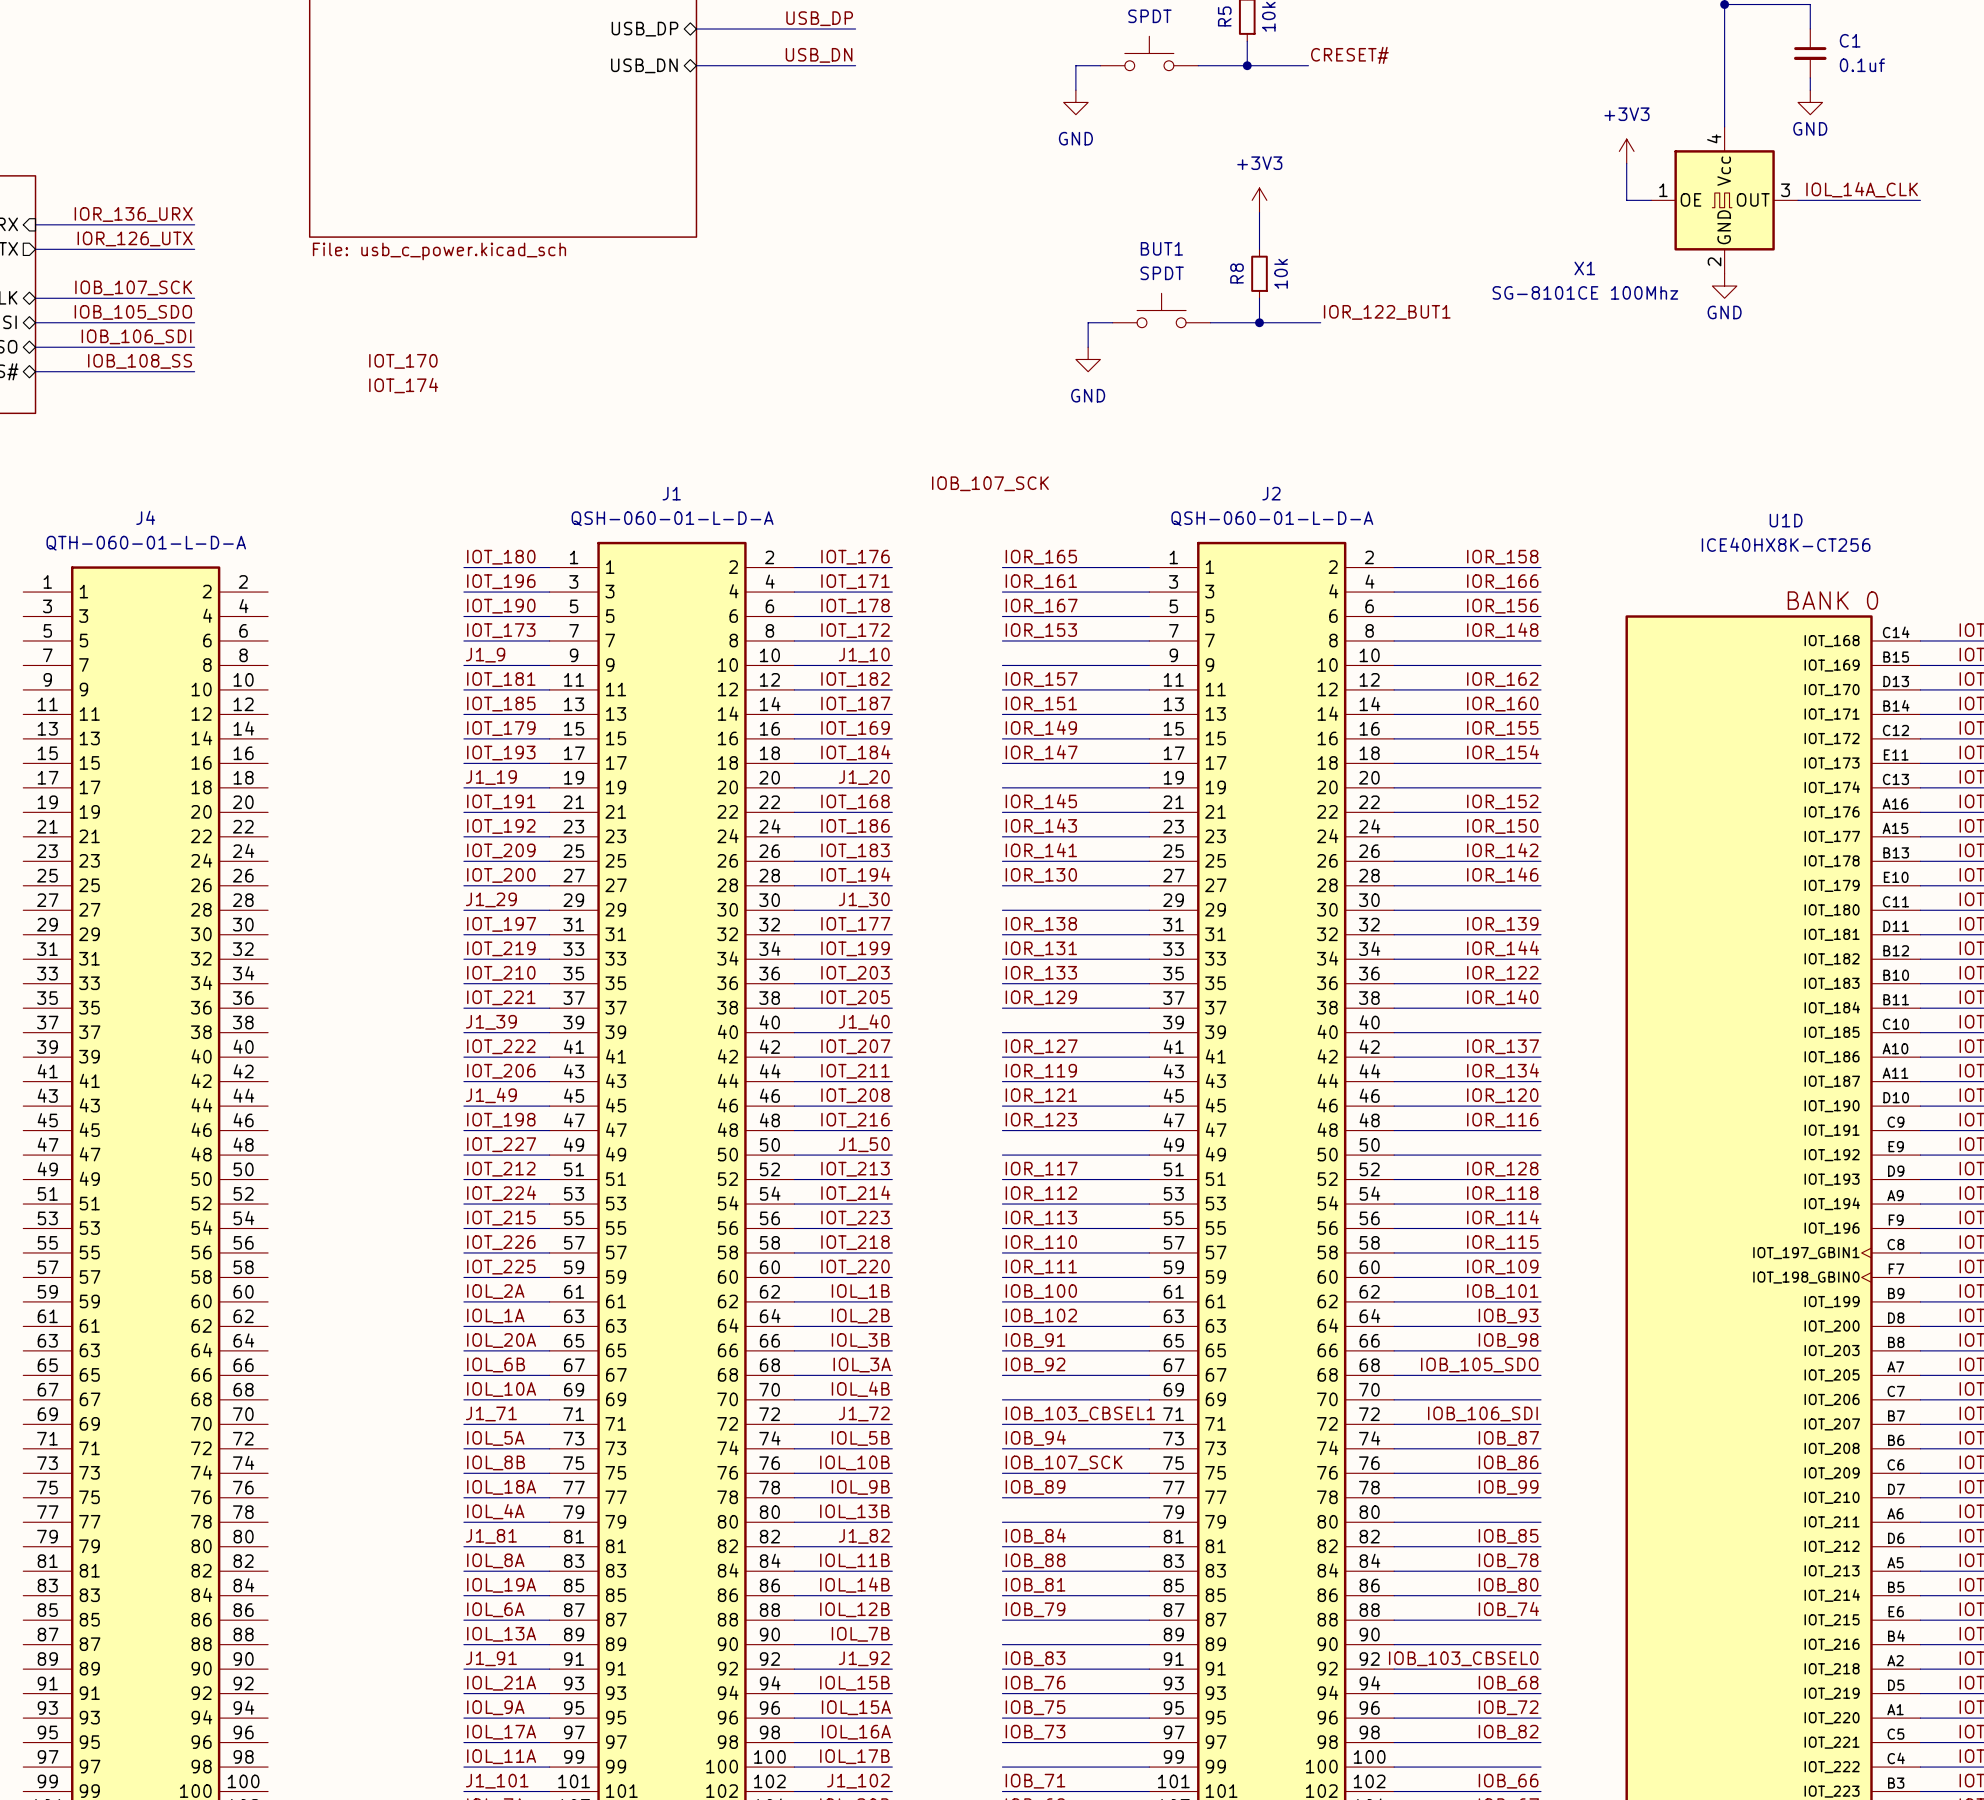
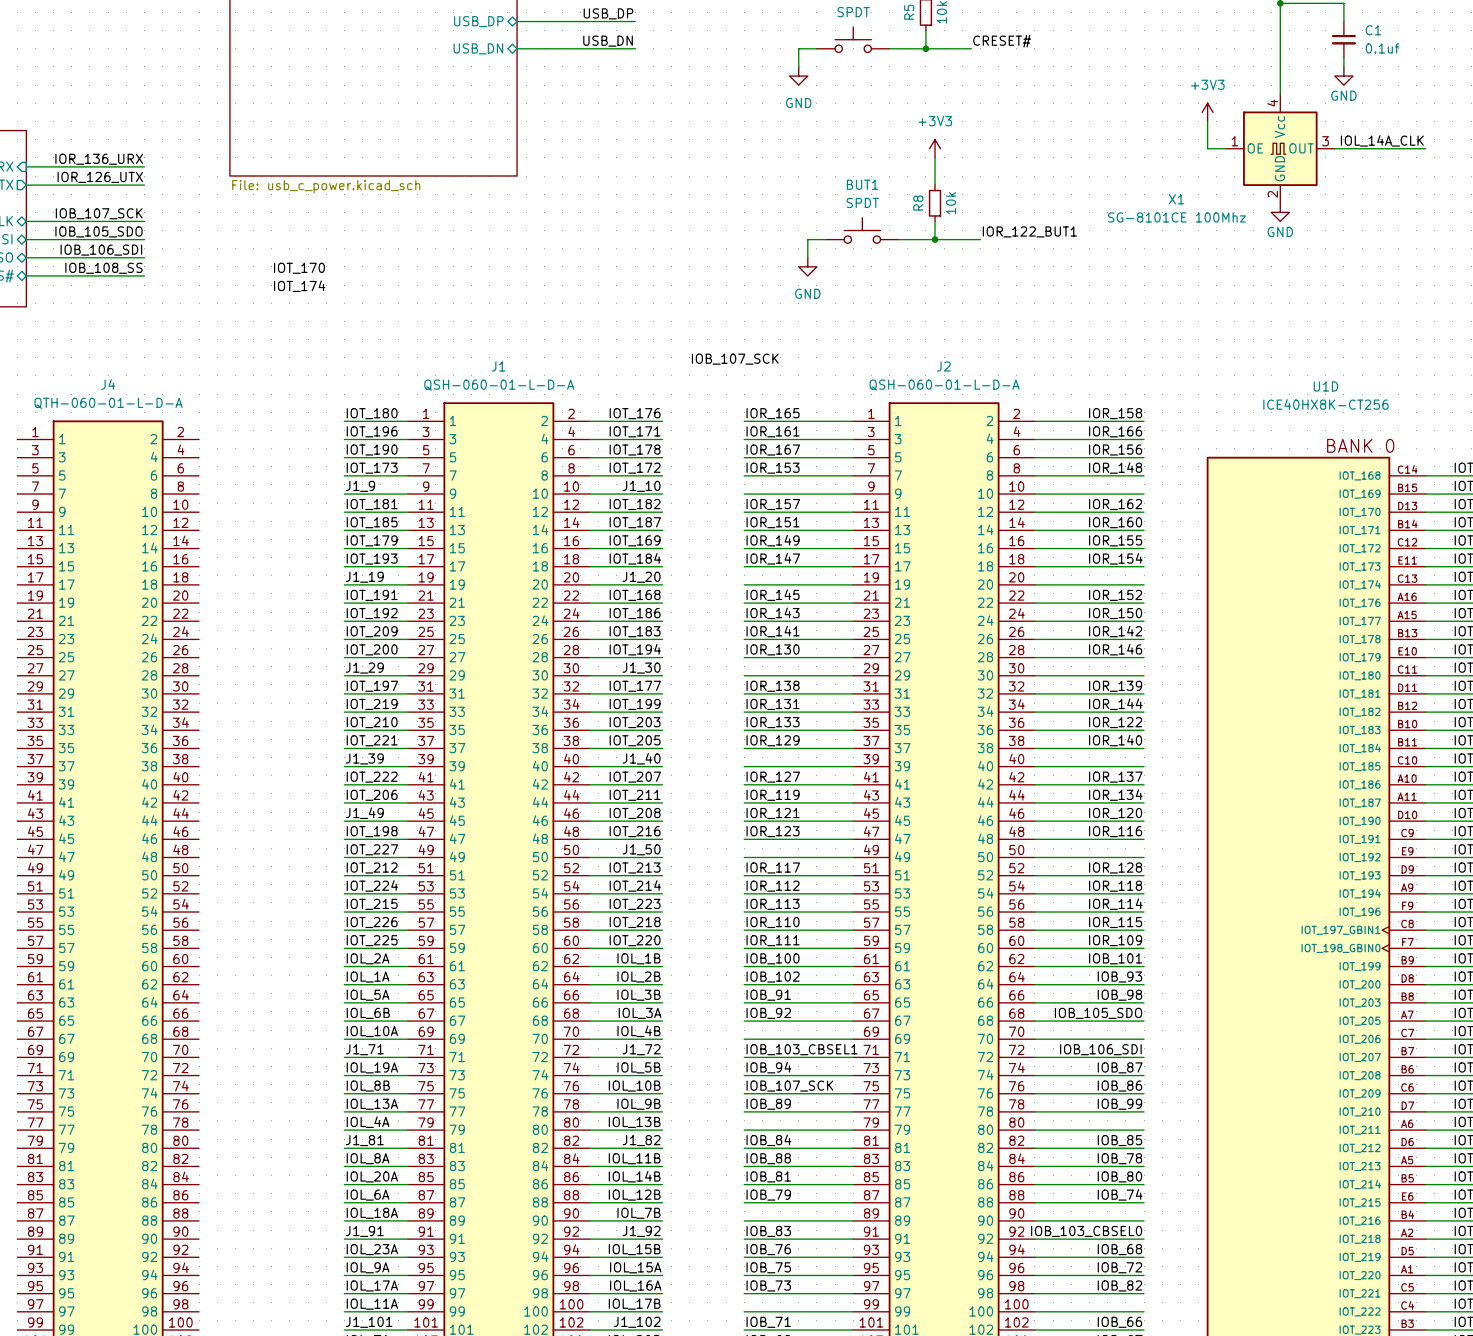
label: IOL_20A (501, 1340) -> IOL_5A (368, 995)
label: IOL_5A (495, 1438) -> IOL_19A (372, 1067)
label: IOL_18A (501, 1487) -> IOL_13A (372, 1104)
label: IOL_19A (501, 1585) -> IOL_20A (372, 1176)
label: IOL_13A (501, 1634) -> IOL_18A (372, 1213)
label: IOL_21A (501, 1683) -> IOL_23A (372, 1249)

